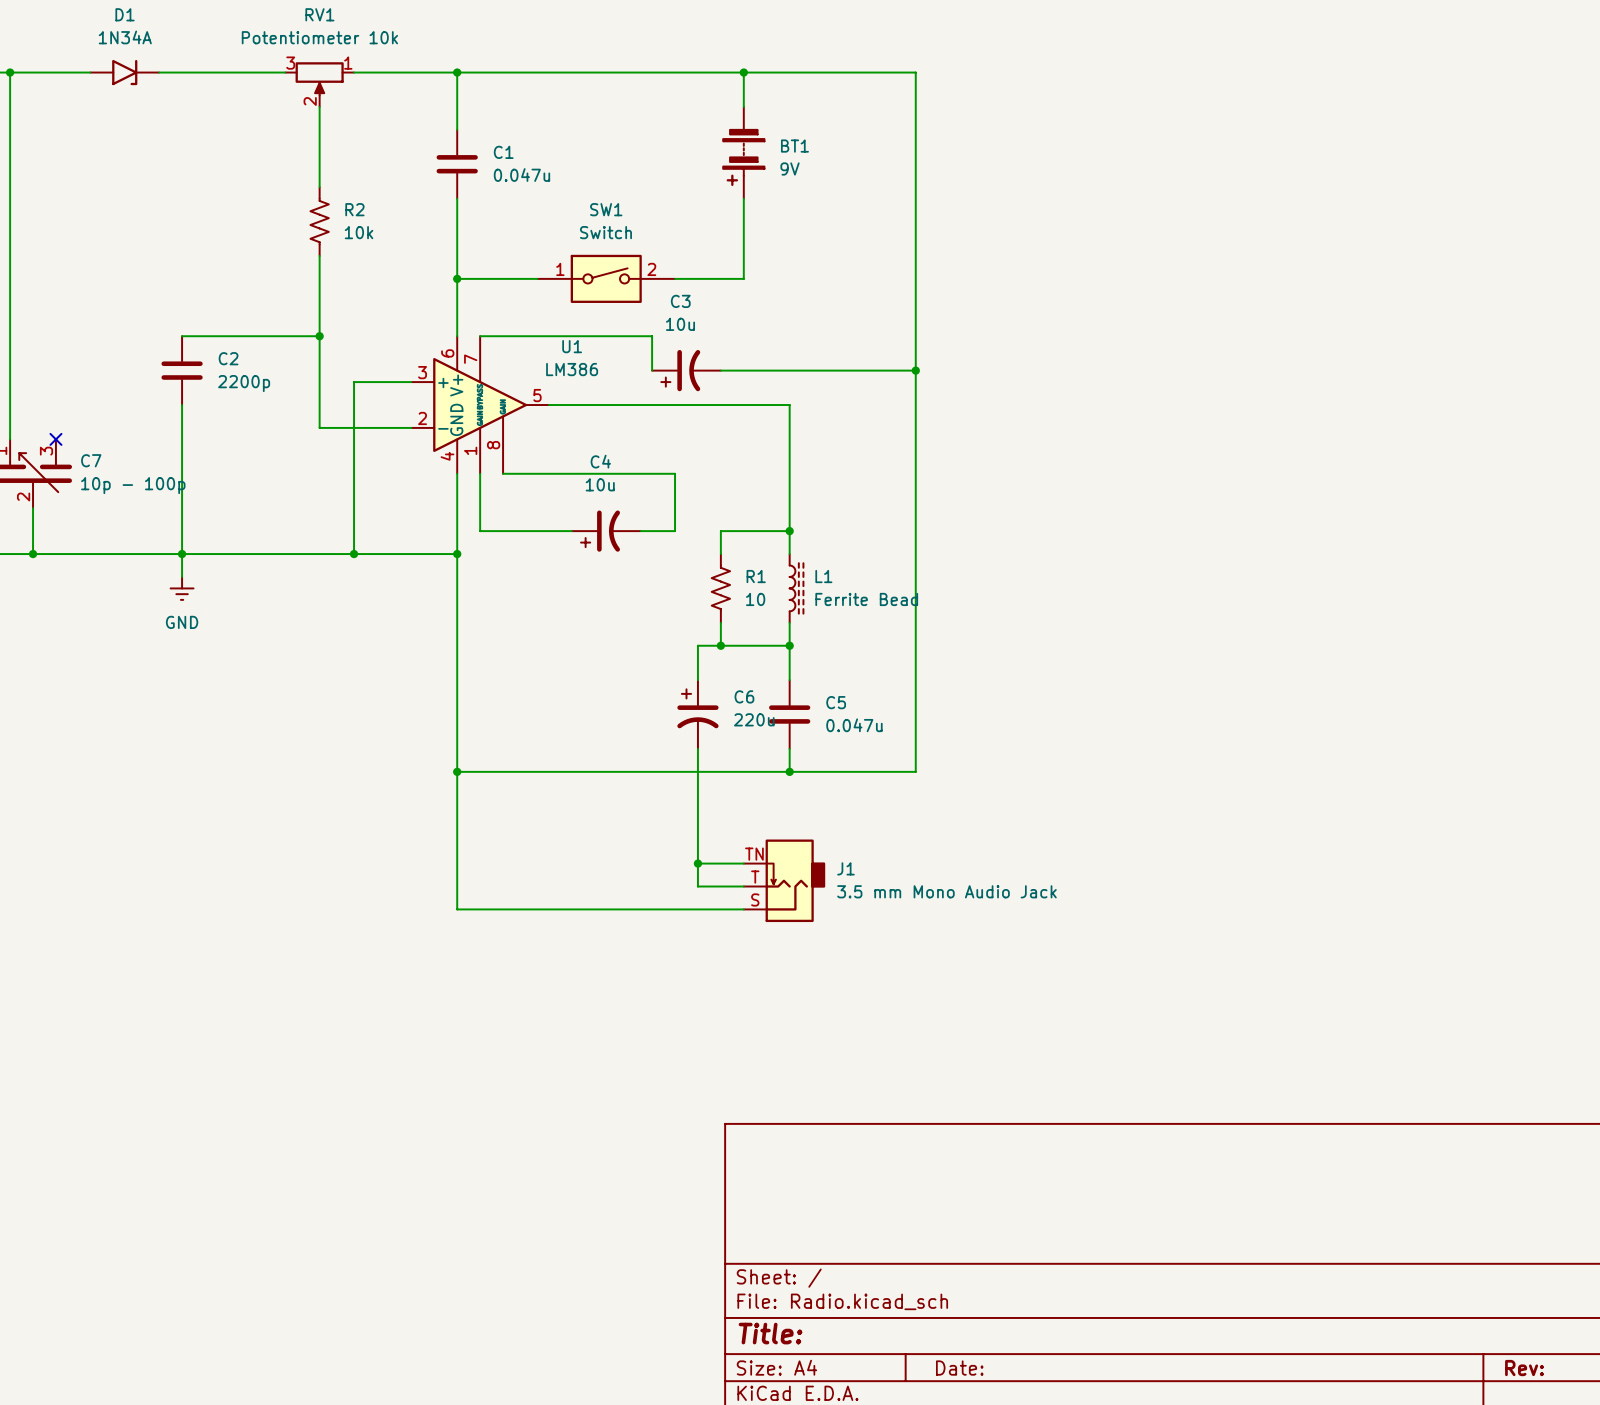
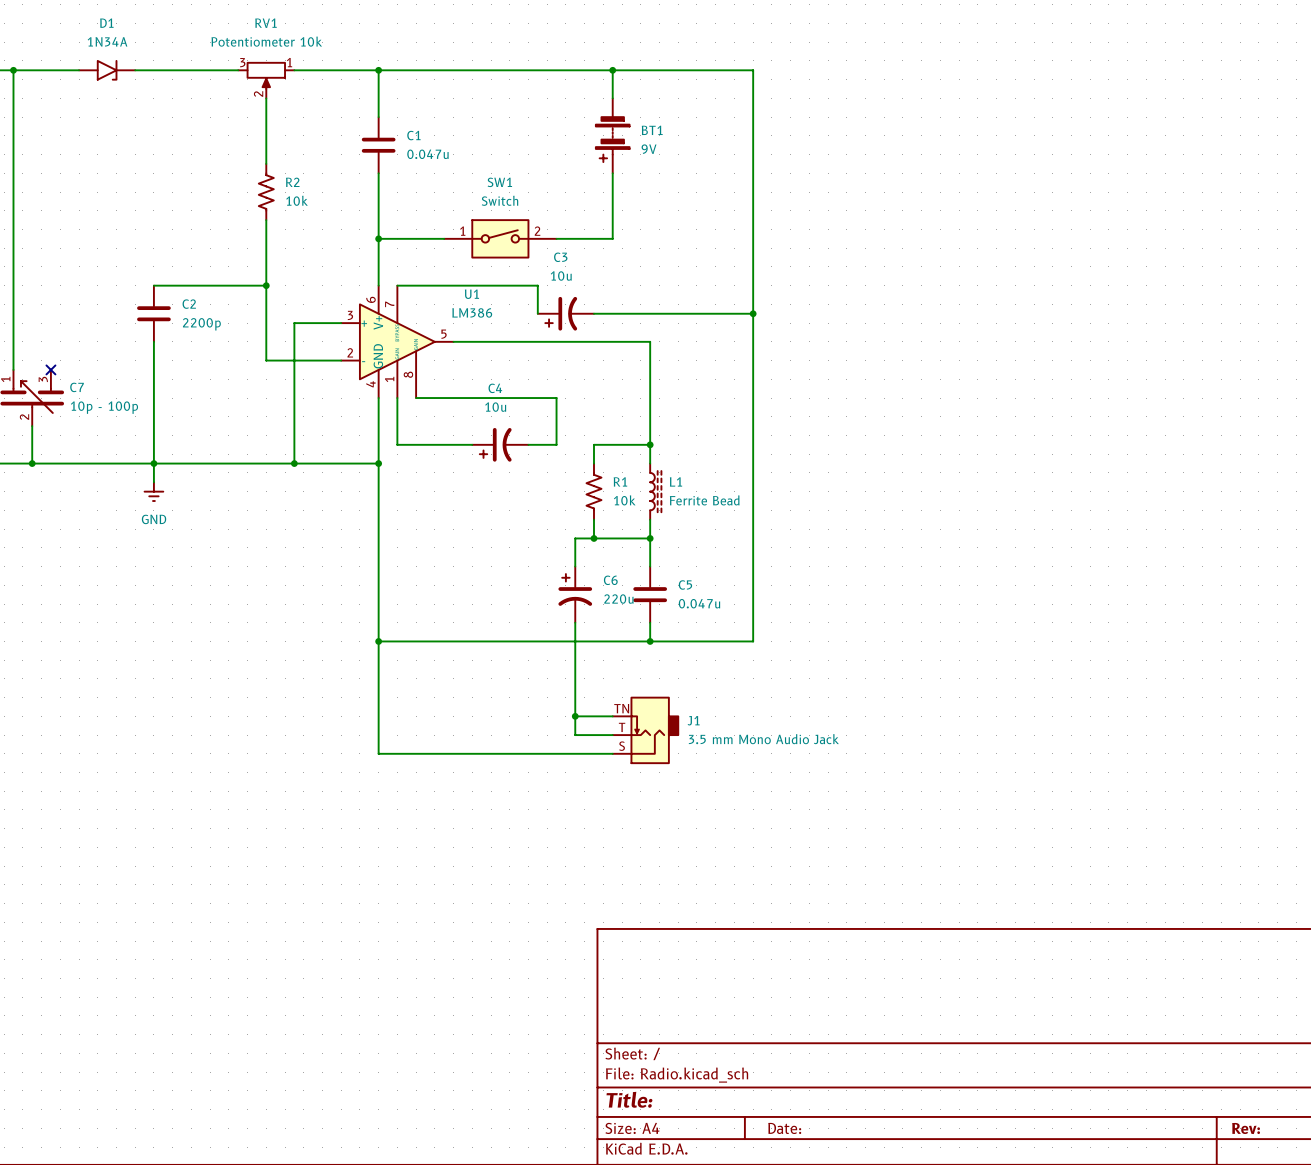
R1 value: 10 (755, 599) -> 10k (624, 500)

